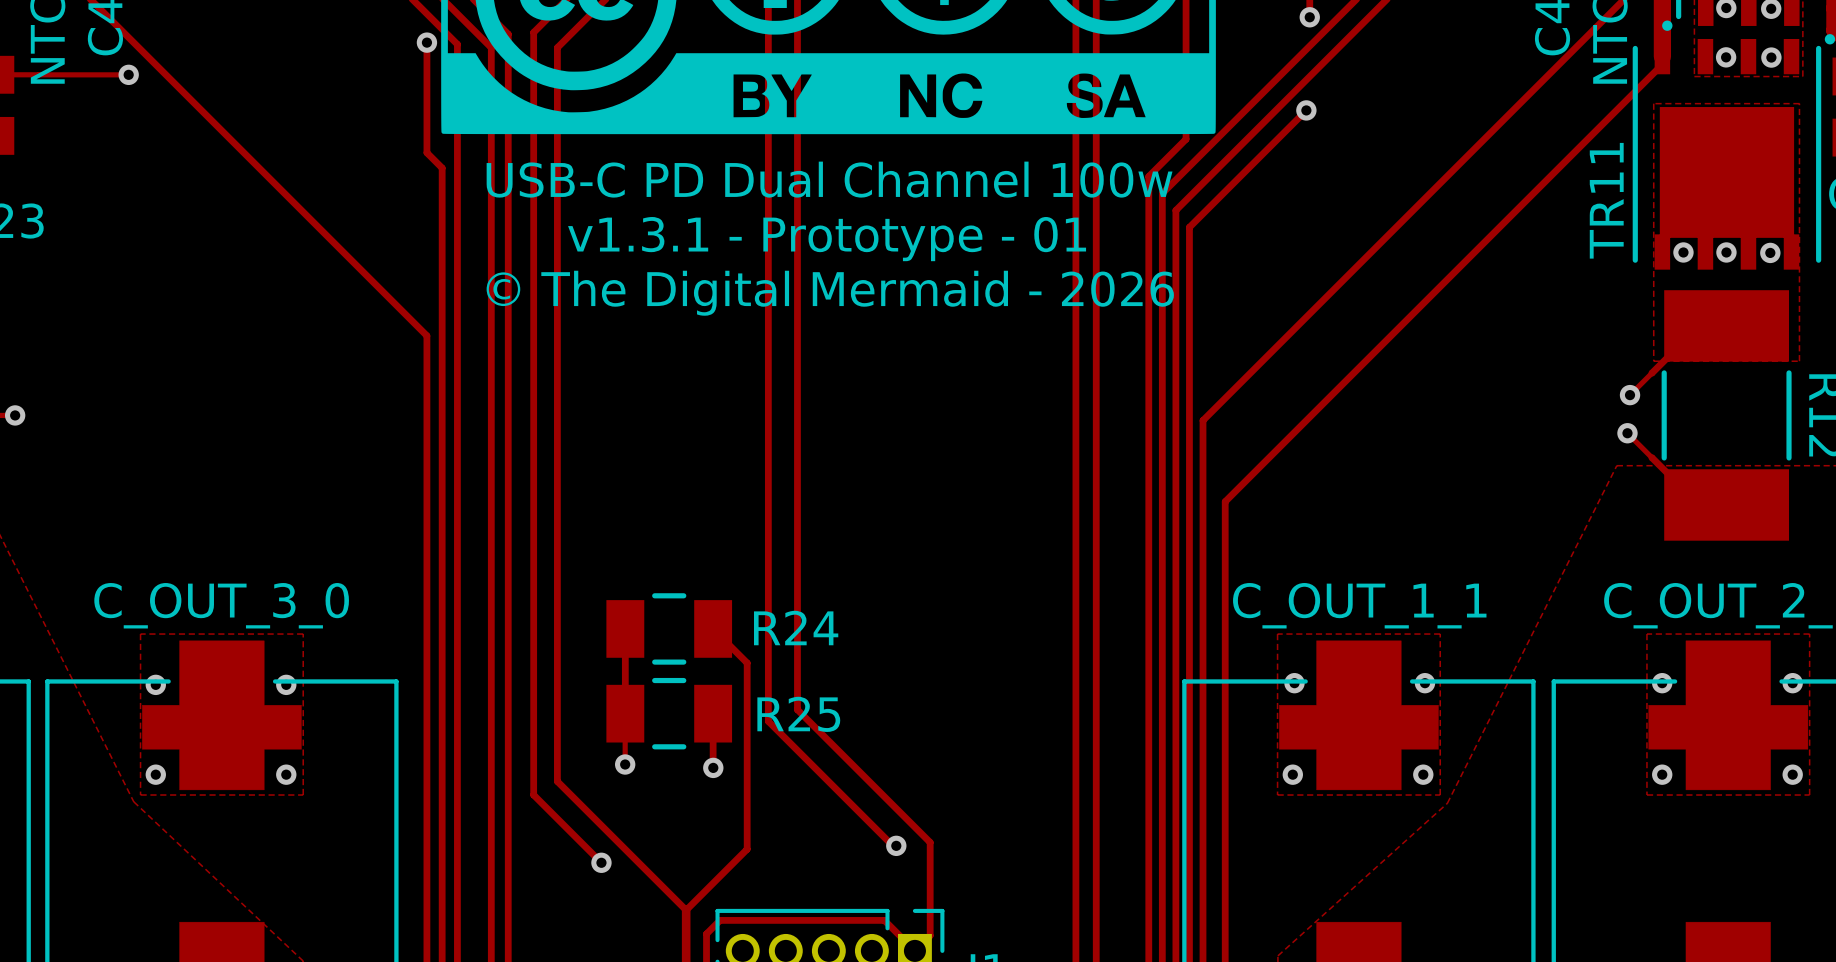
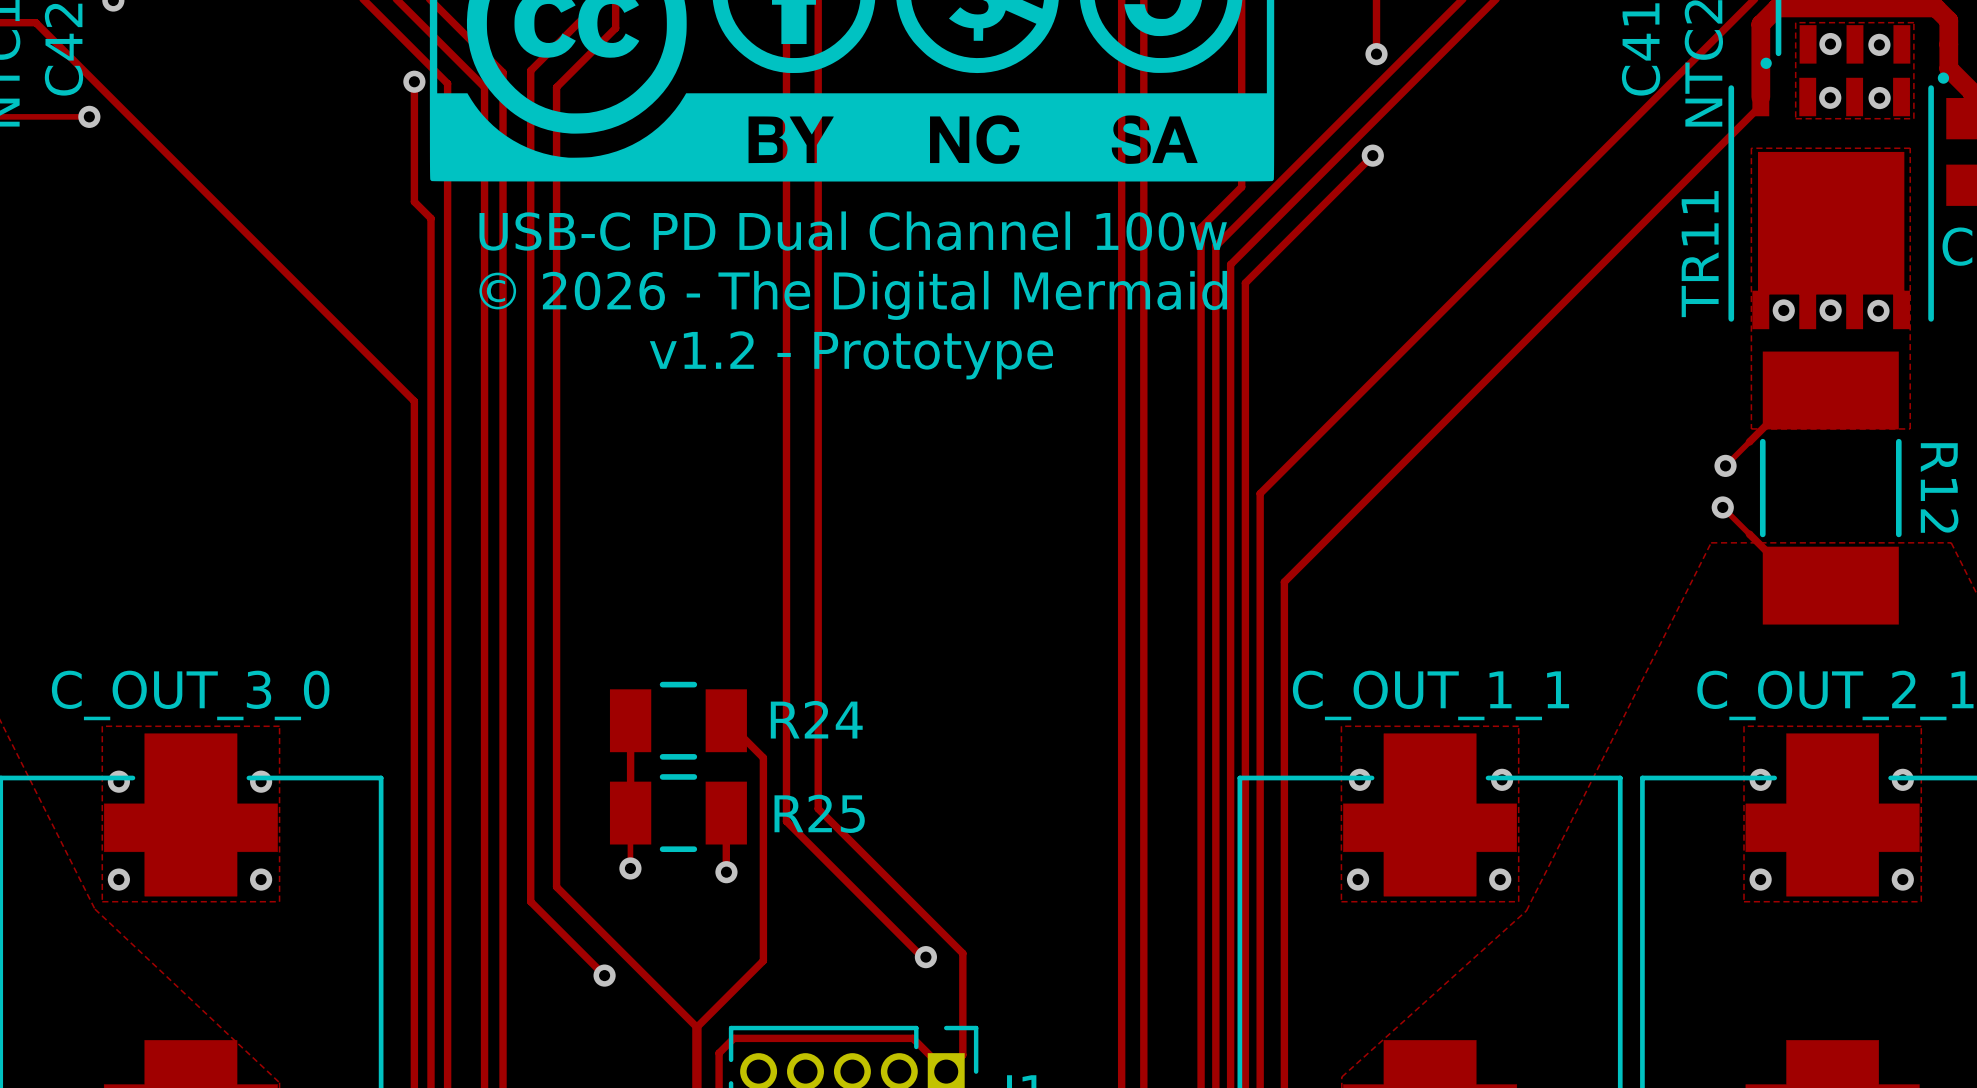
text: v1.3.1 - Prototype - 01 (827, 239) -> © 2026 - The Digital Mermaid (853, 295)
text: © The Digital Mermaid - 2026 (830, 293) -> v1.2 - Prototype (851, 355)

